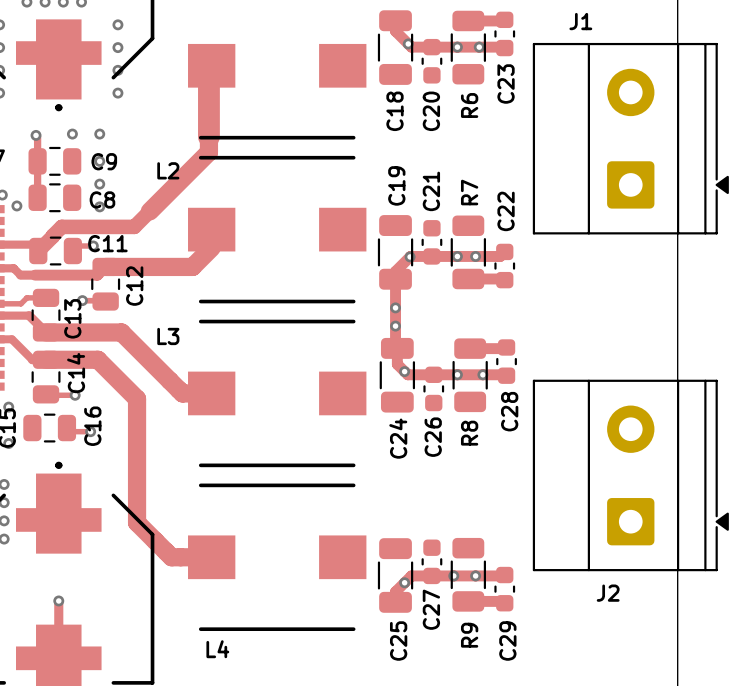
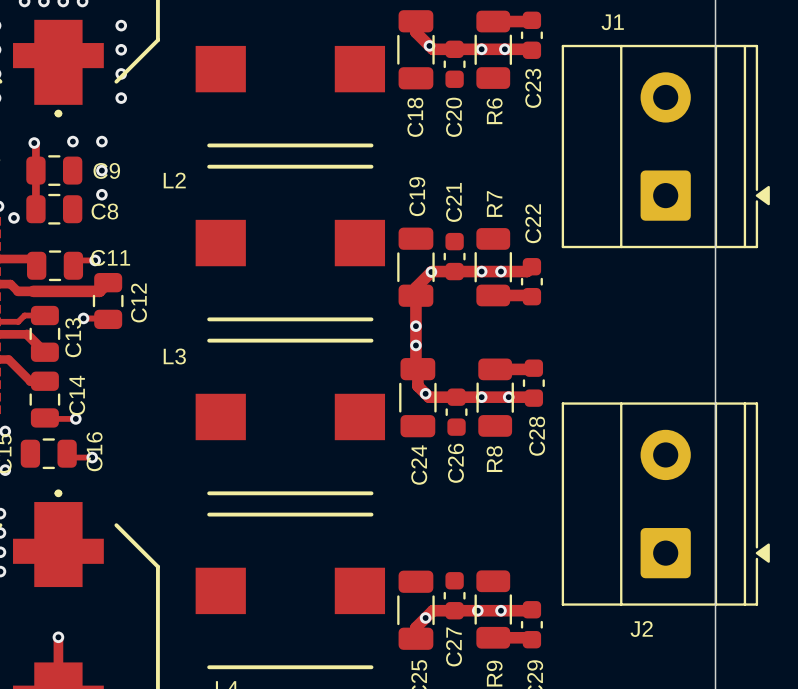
track: (208, 68) (208, 152) (134, 226) (61, 226) (38, 251) -> none
via: (99, 206) -> none
track: (211, 247) (192, 266) (105, 266) -> none
track: (46, 332) (121, 332) (182, 393) (211, 393) -> none
track: (46, 359) (97, 359) (137, 398) (137, 522) (171, 557) (211, 557) -> none

